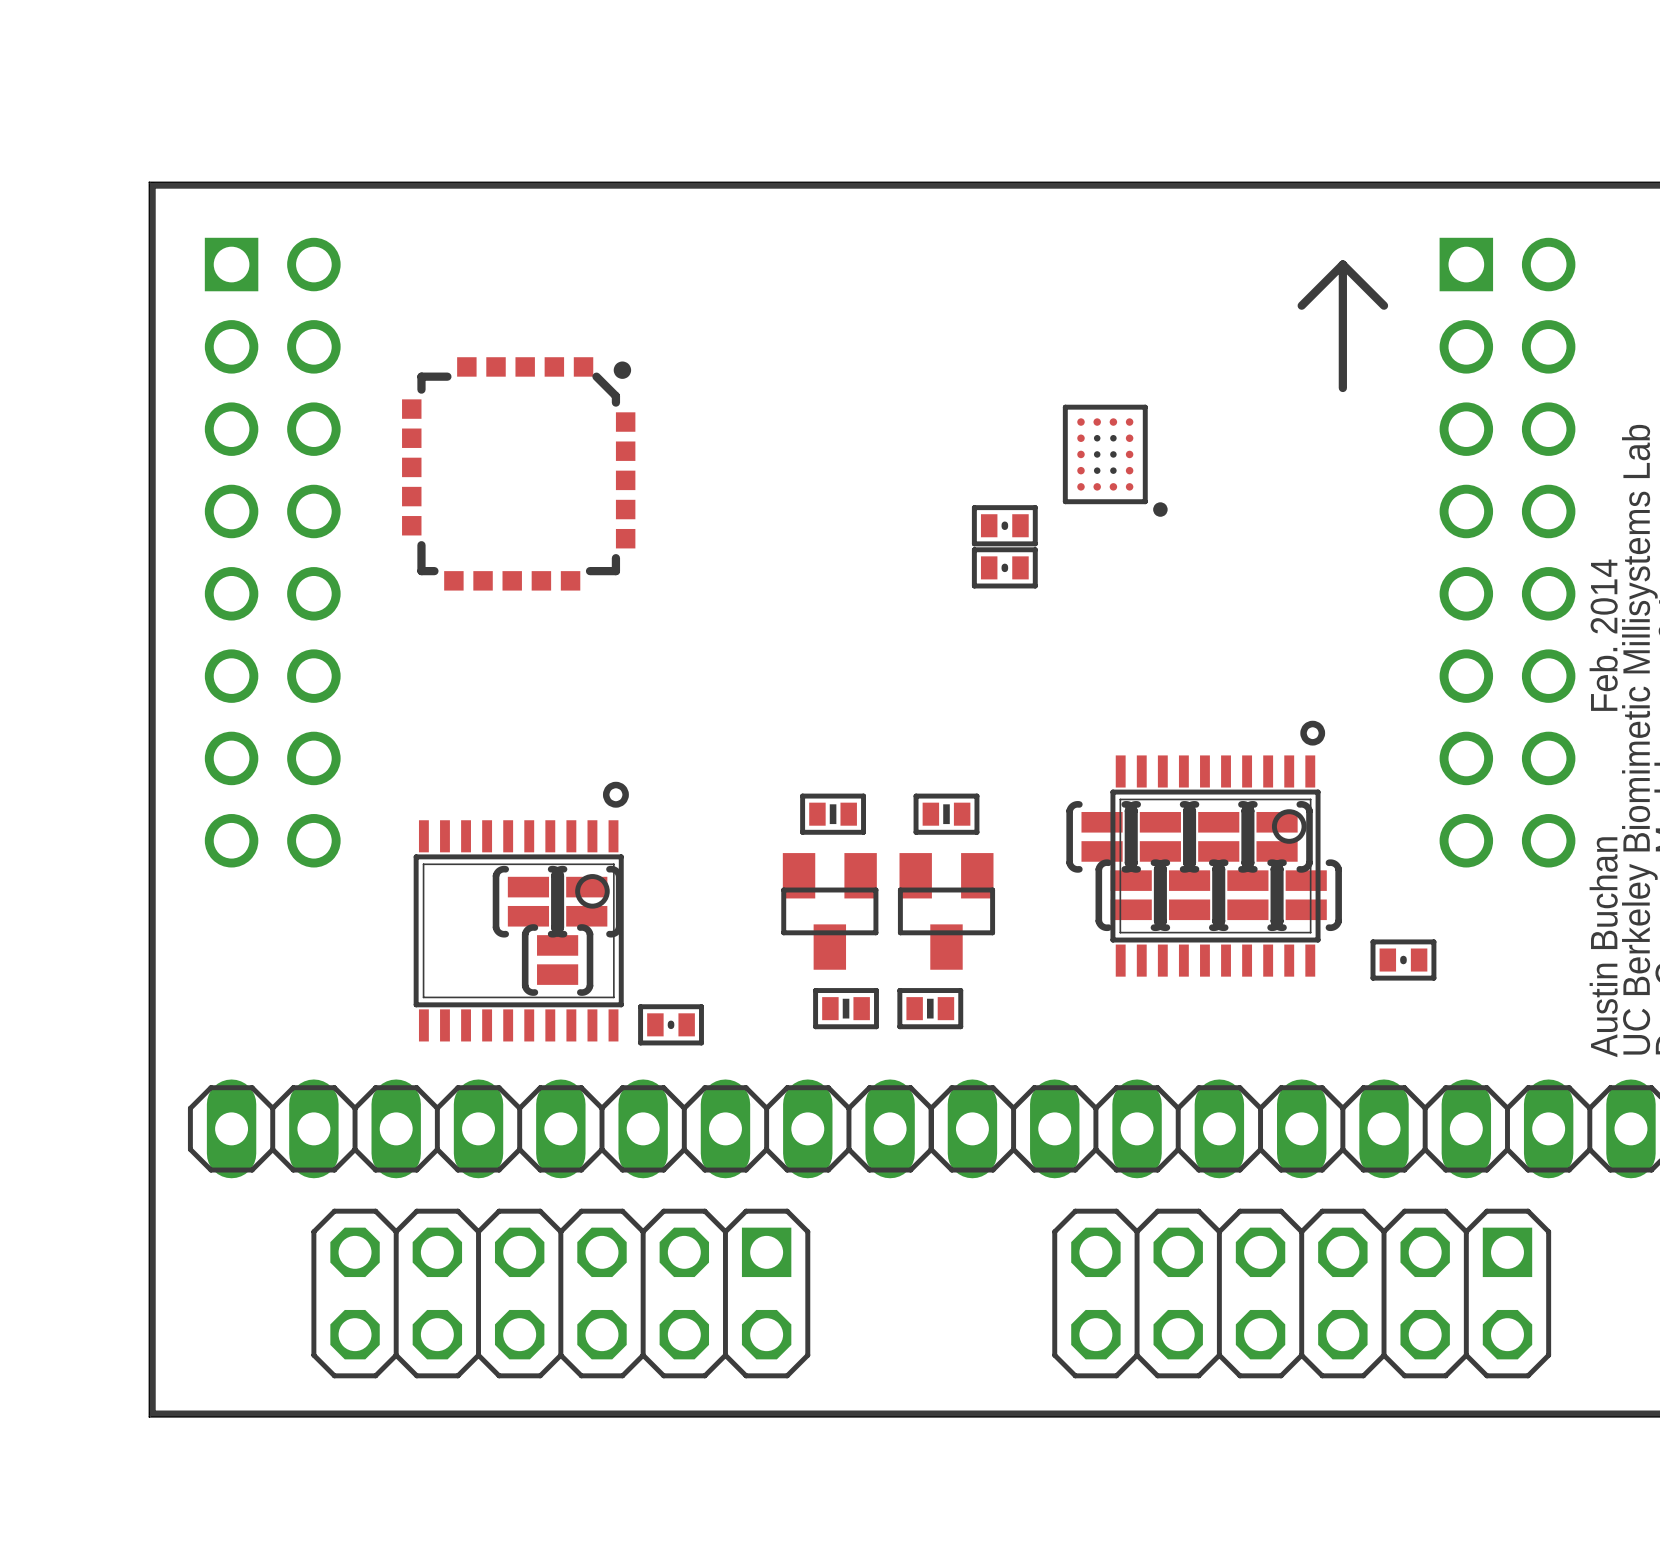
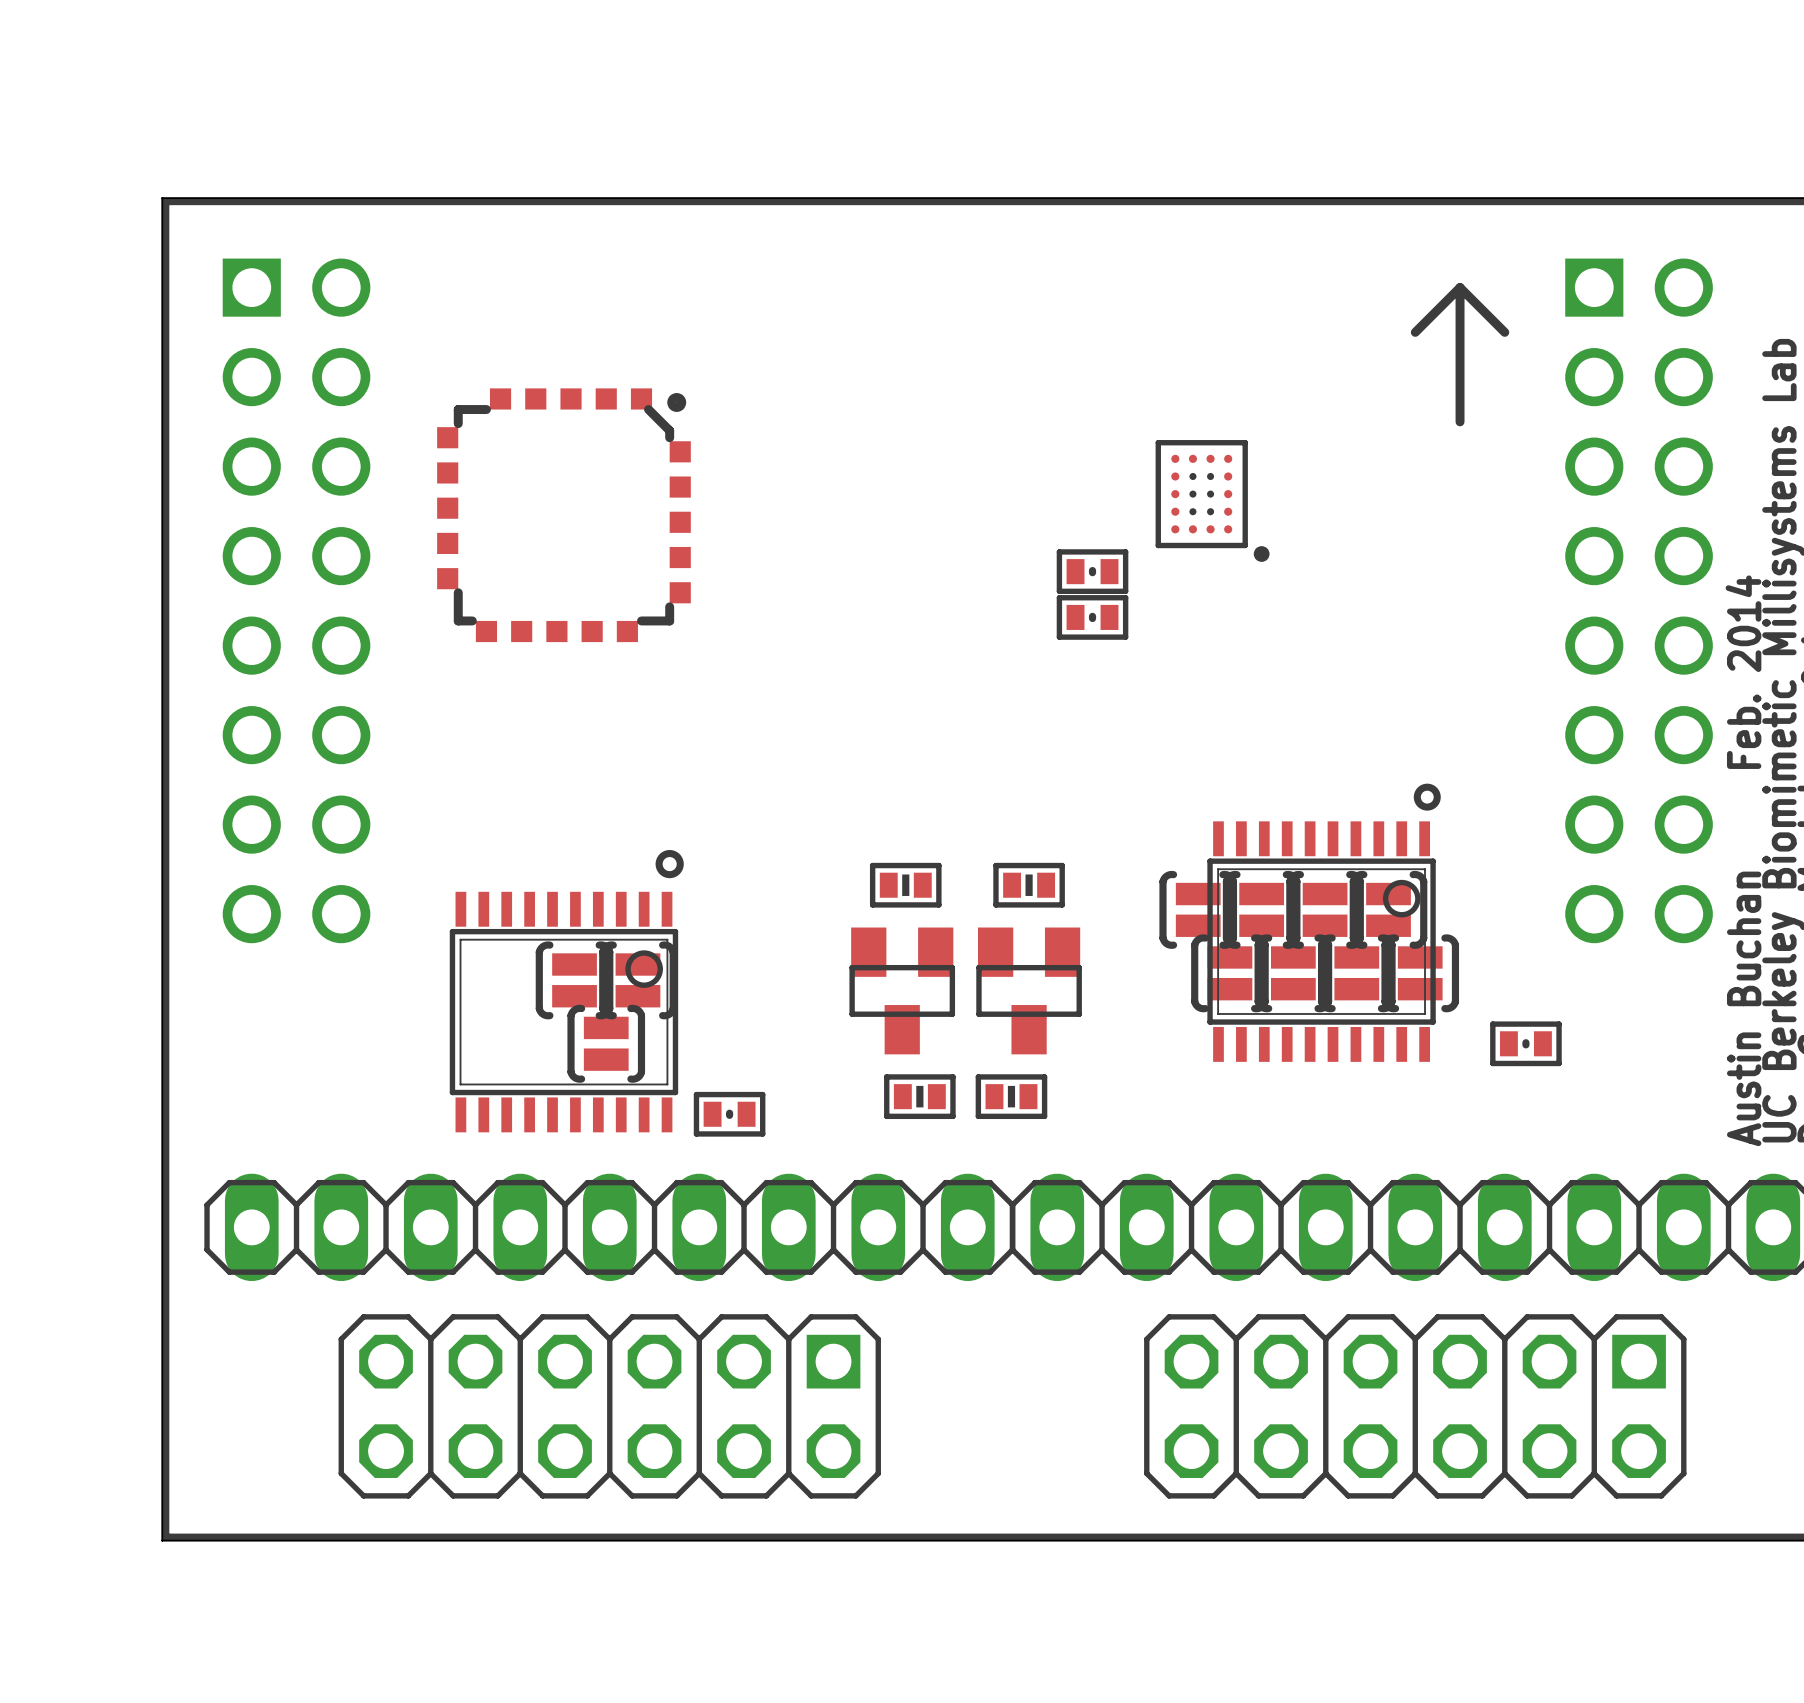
part footprint: [402, 357, 636, 591] -> [437, 388, 691, 643]

